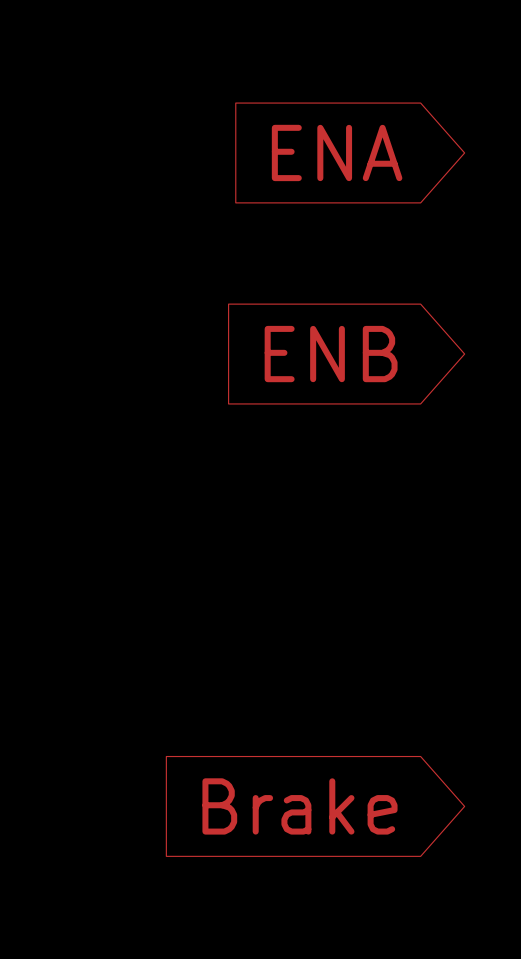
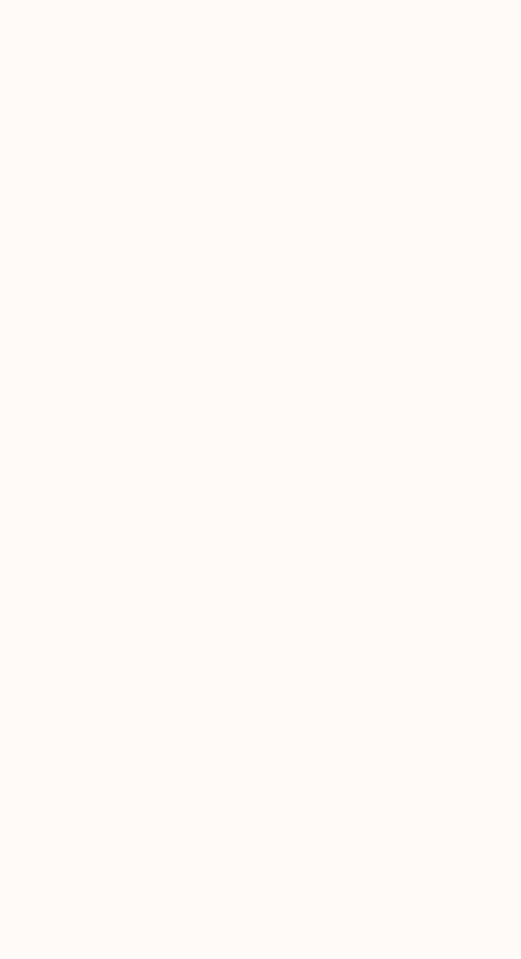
global label: ENA (337, 152) -> none
global label: ENB (331, 354) -> none
global label: Brake (299, 806) -> none

